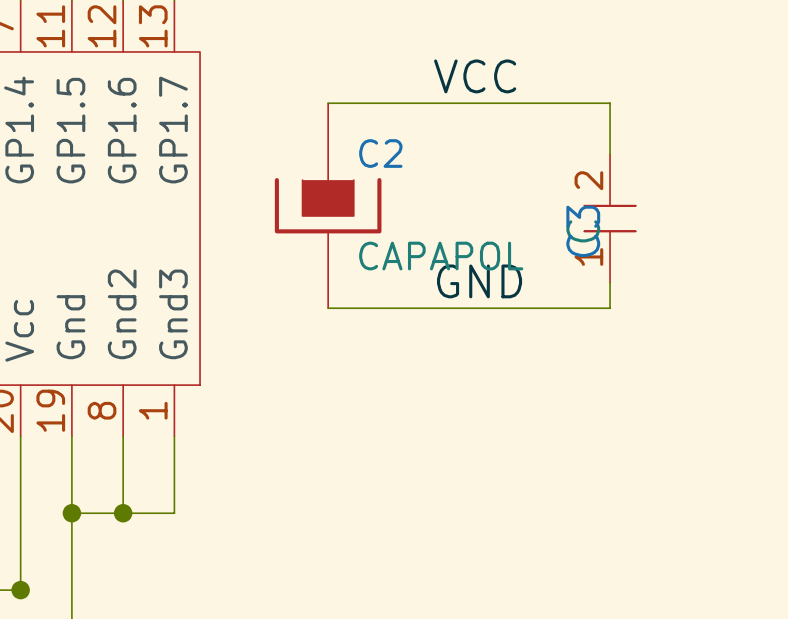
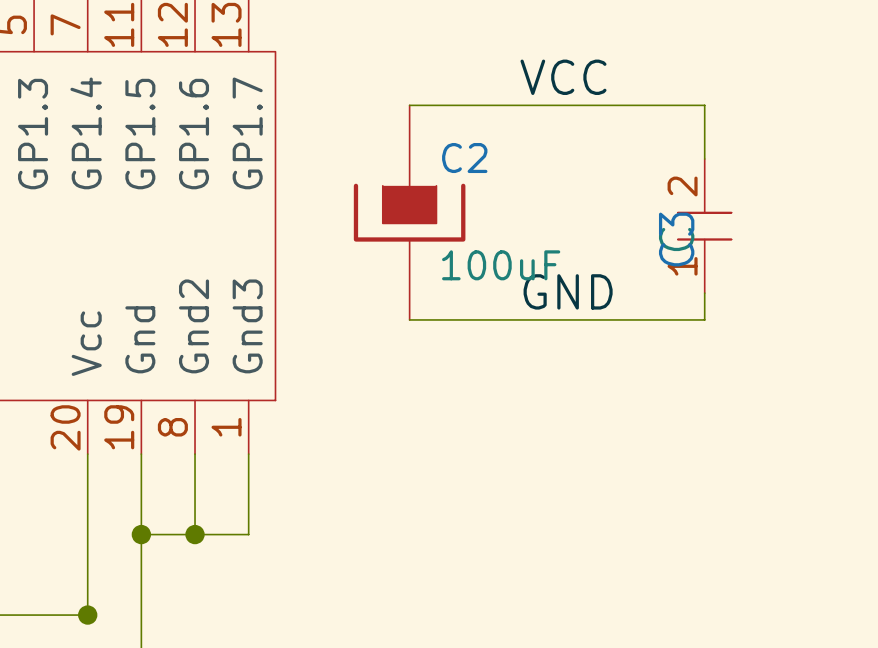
C2 value: CAPAPOL (441, 256) -> 100uF (501, 265)

